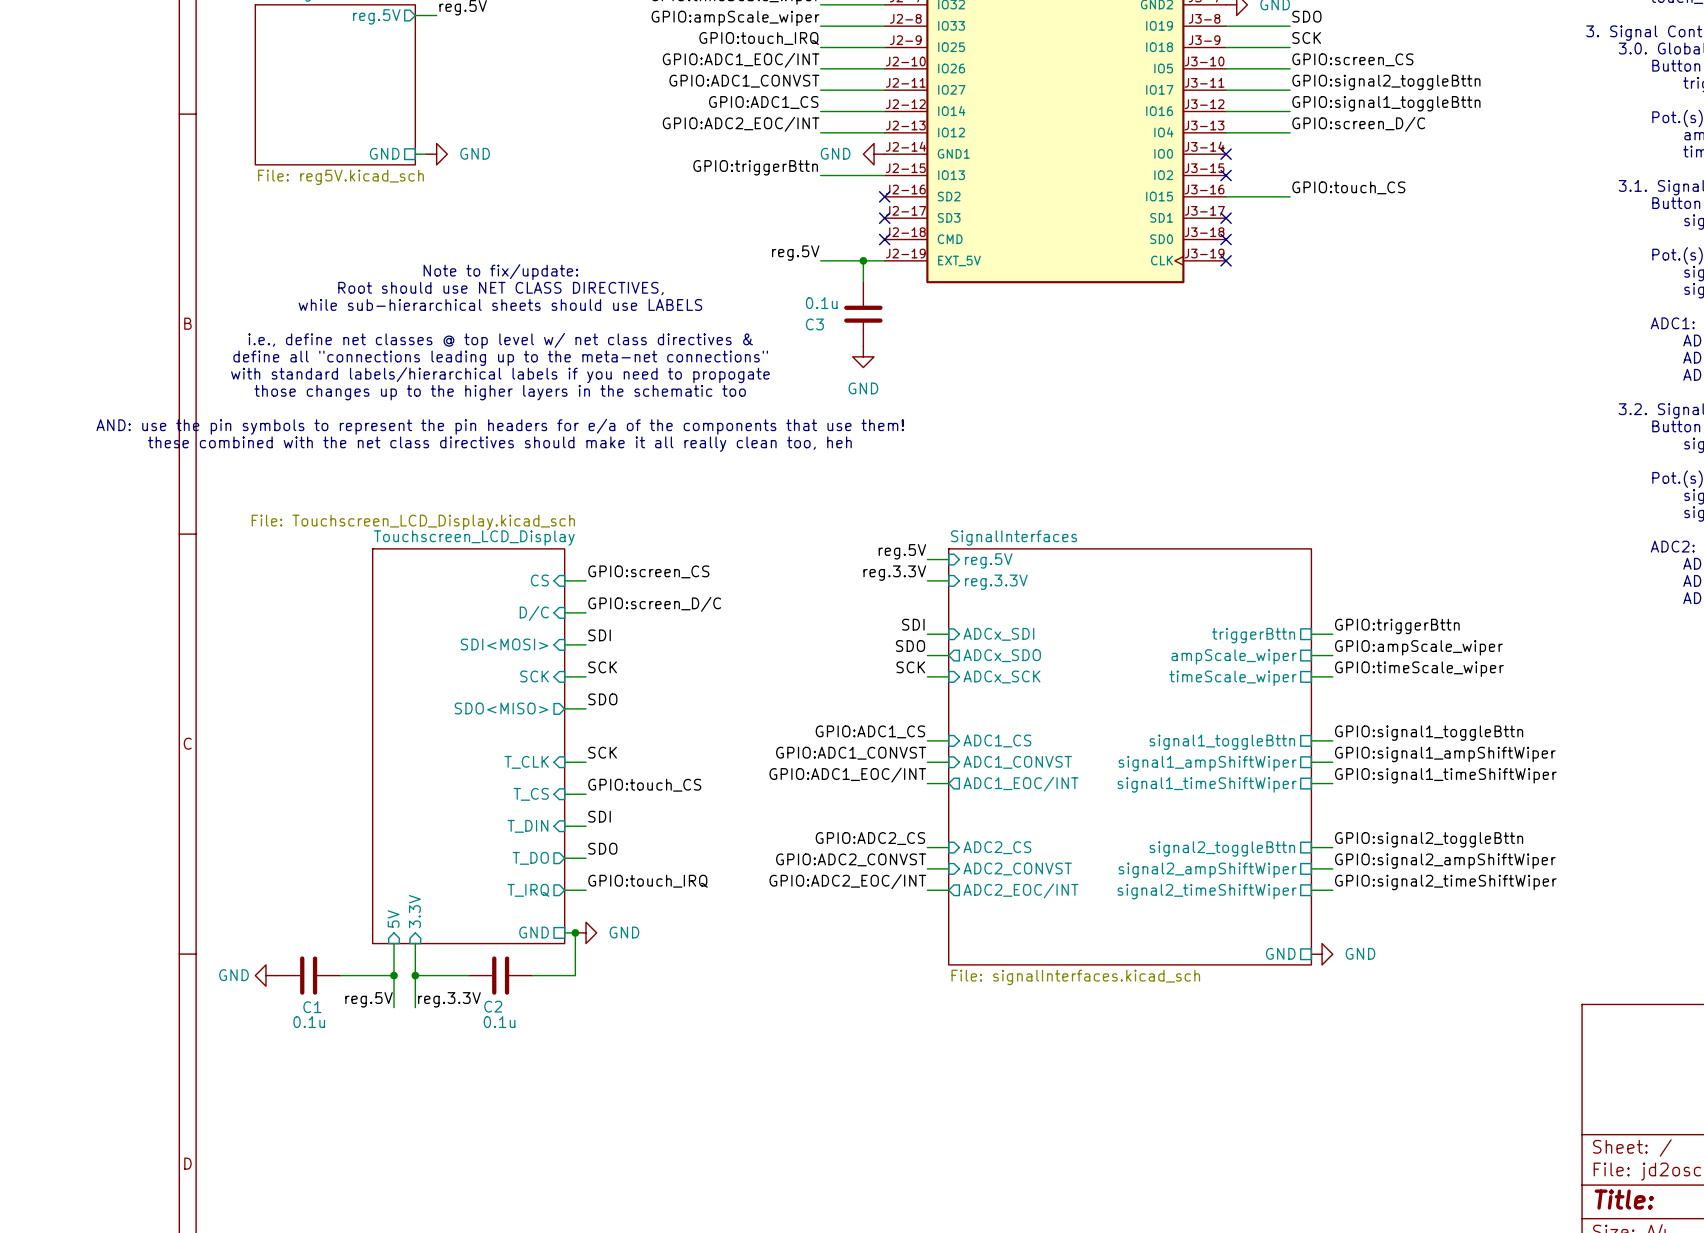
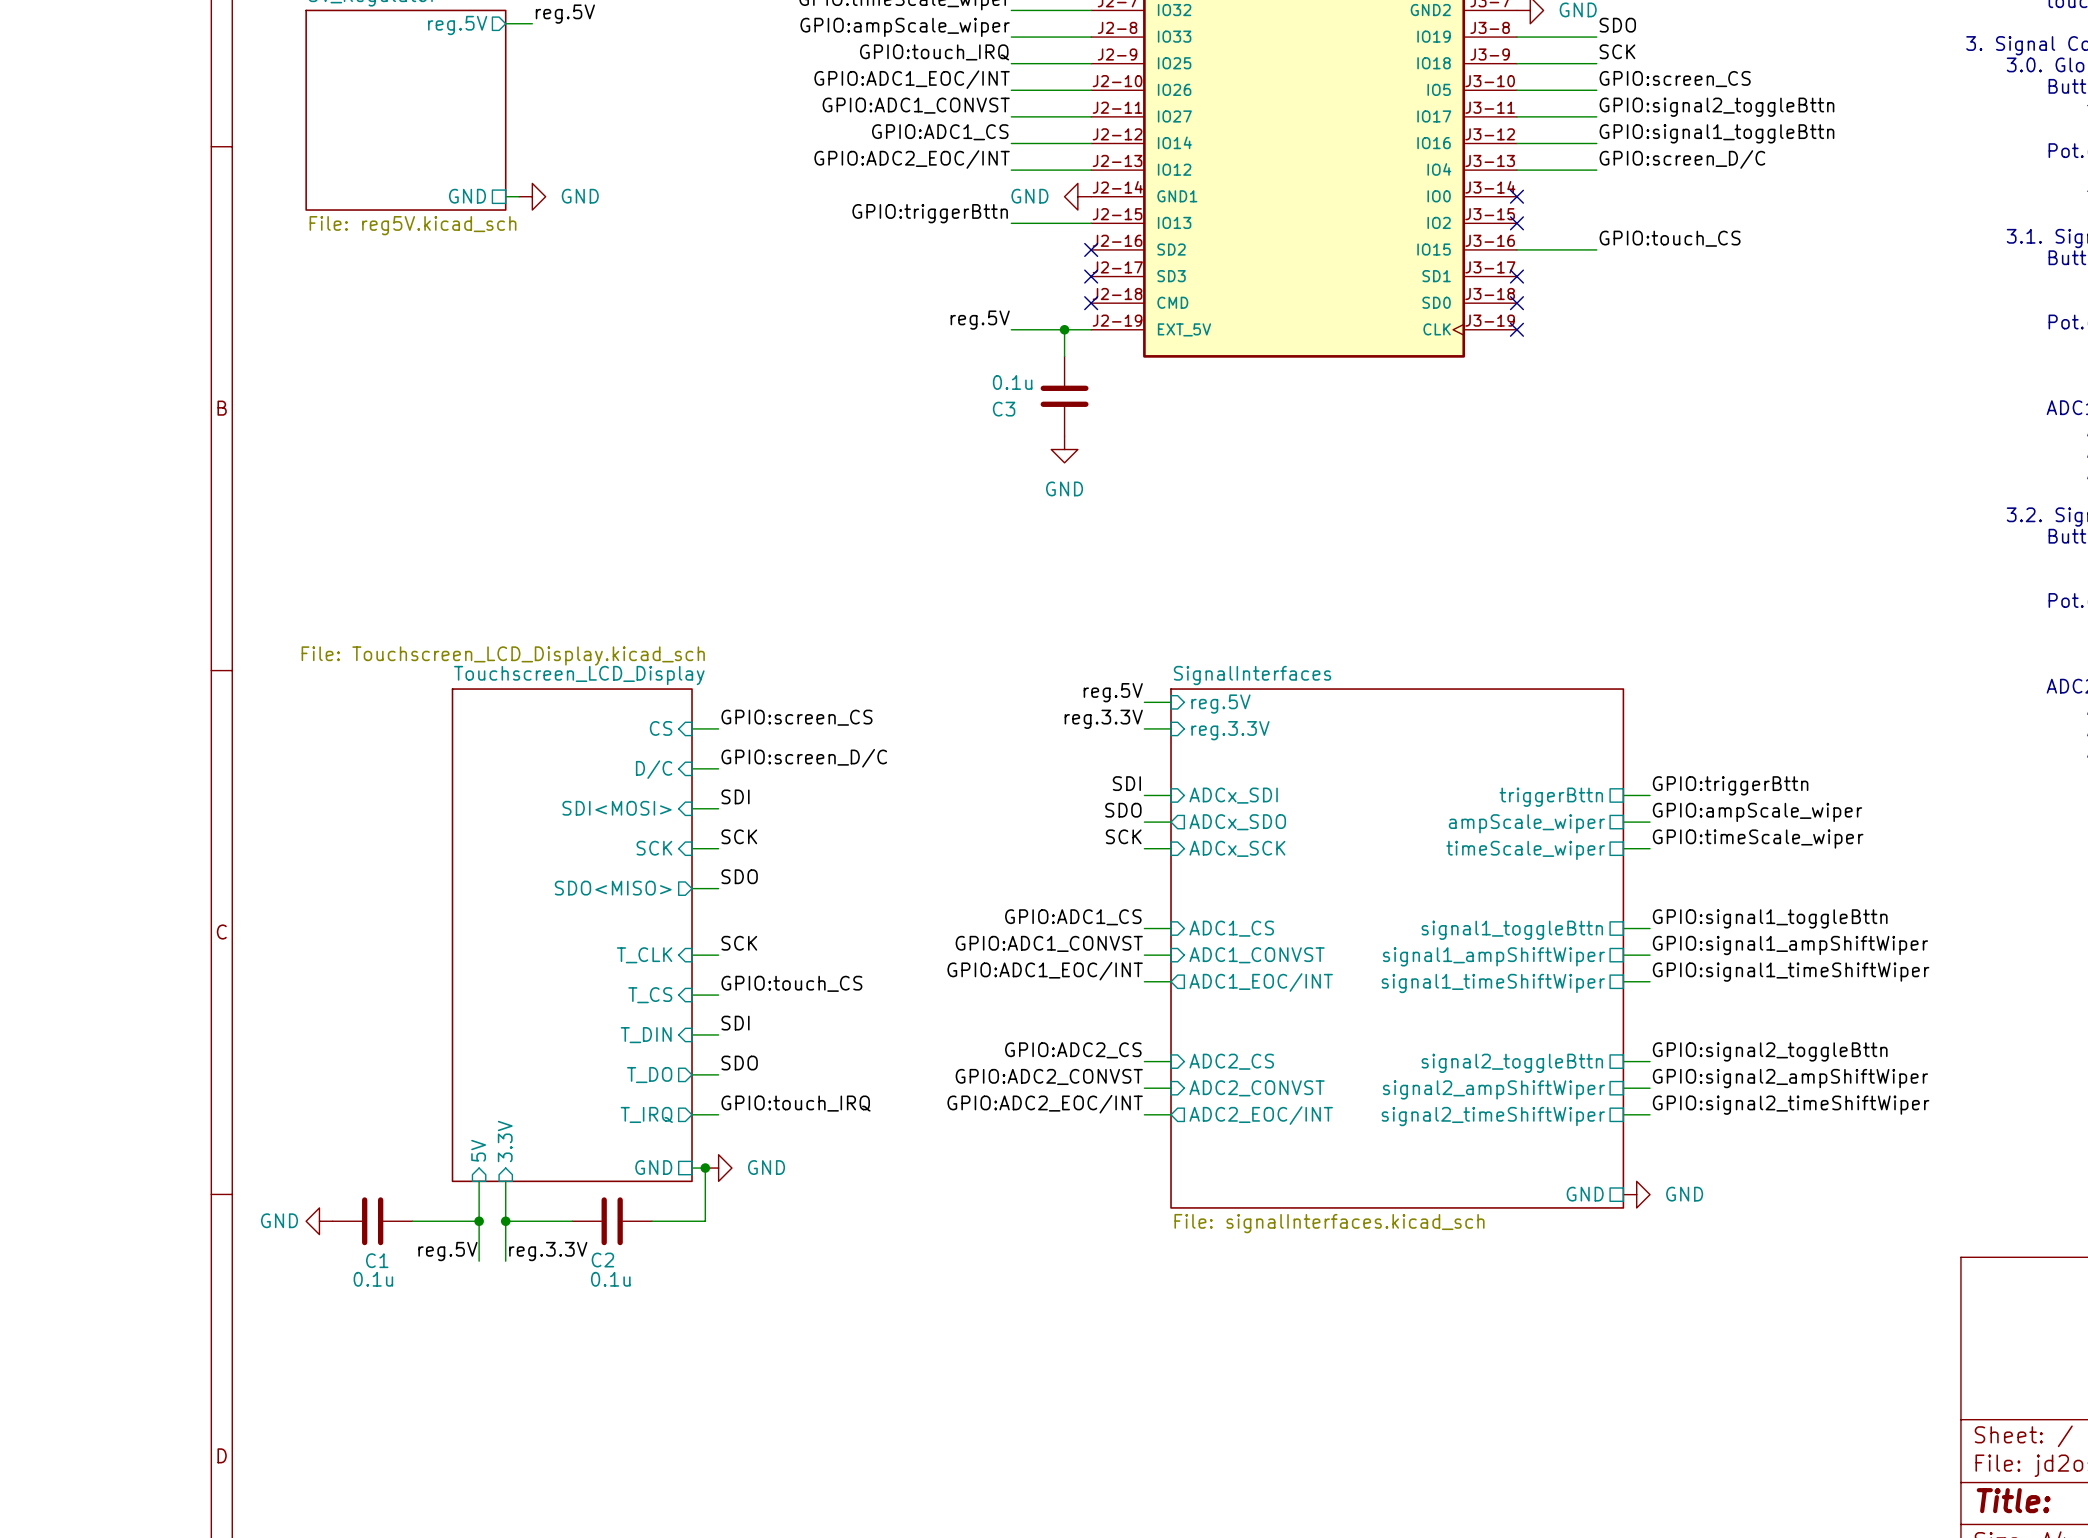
text: Note to fix/update: (500, 272) -> none
text: Root should use NET CLASS DIRECTIVES, (500, 288) -> none
text: while sub-hierarchical sheets should use LABELS (500, 304) -> none
text: i.e., define net classes @ top level w/ net class directives & (500, 340) -> none
text: define all "connections leading up to the meta-net connections" (500, 358) -> none
text: with standard labels/hierarchical labels if you need to propogate (500, 375) -> none
text: those changes up to the higher layers in the schematic too (500, 392) -> none
text: AND: use the pin symbols to represent the pin headers for e/a of the components that use them! (500, 426) -> none
text: these combined with the net class directives should make it all really clean too, heh (499, 444) -> none

